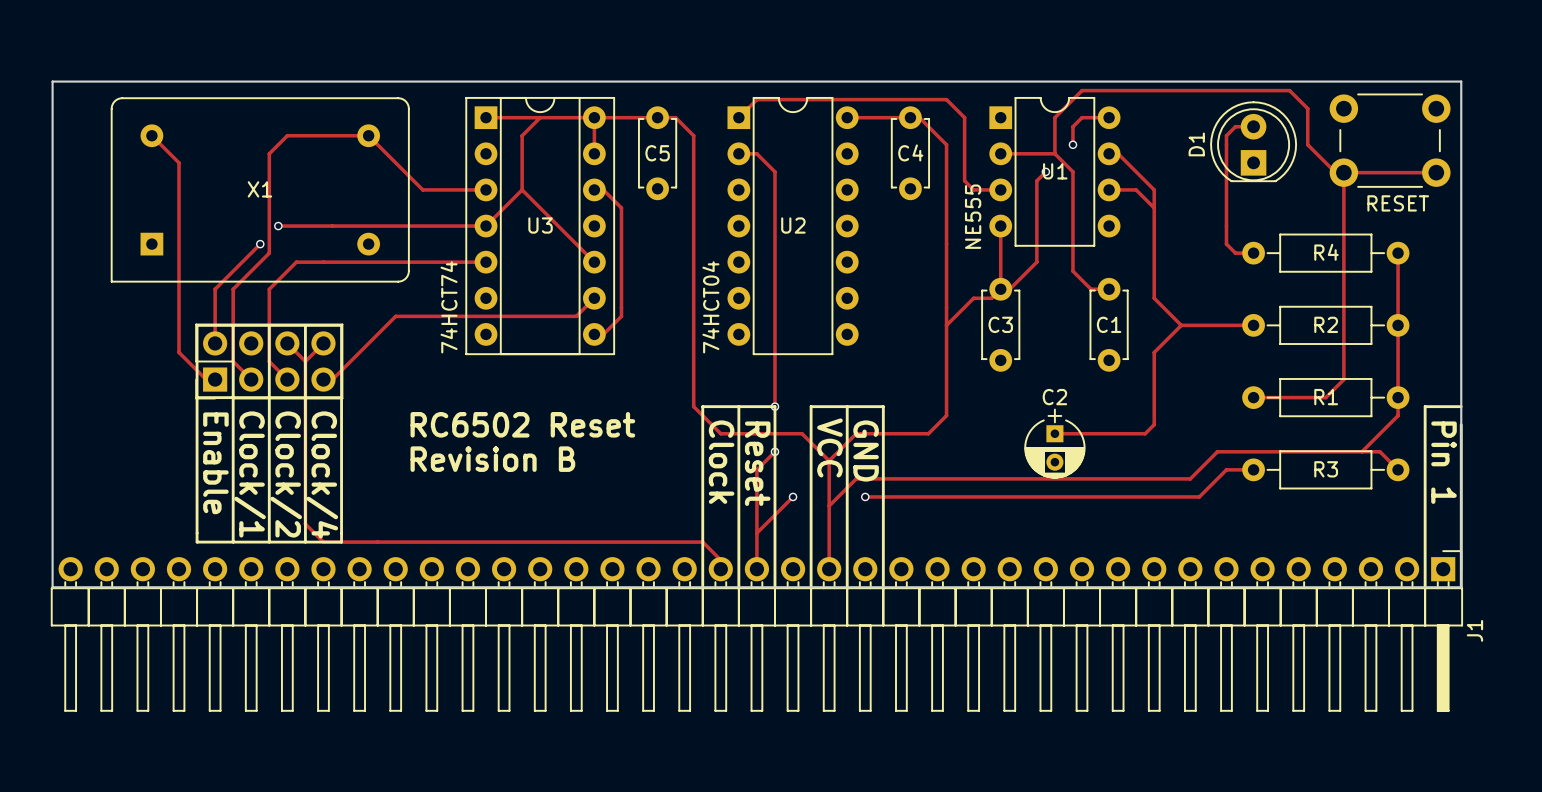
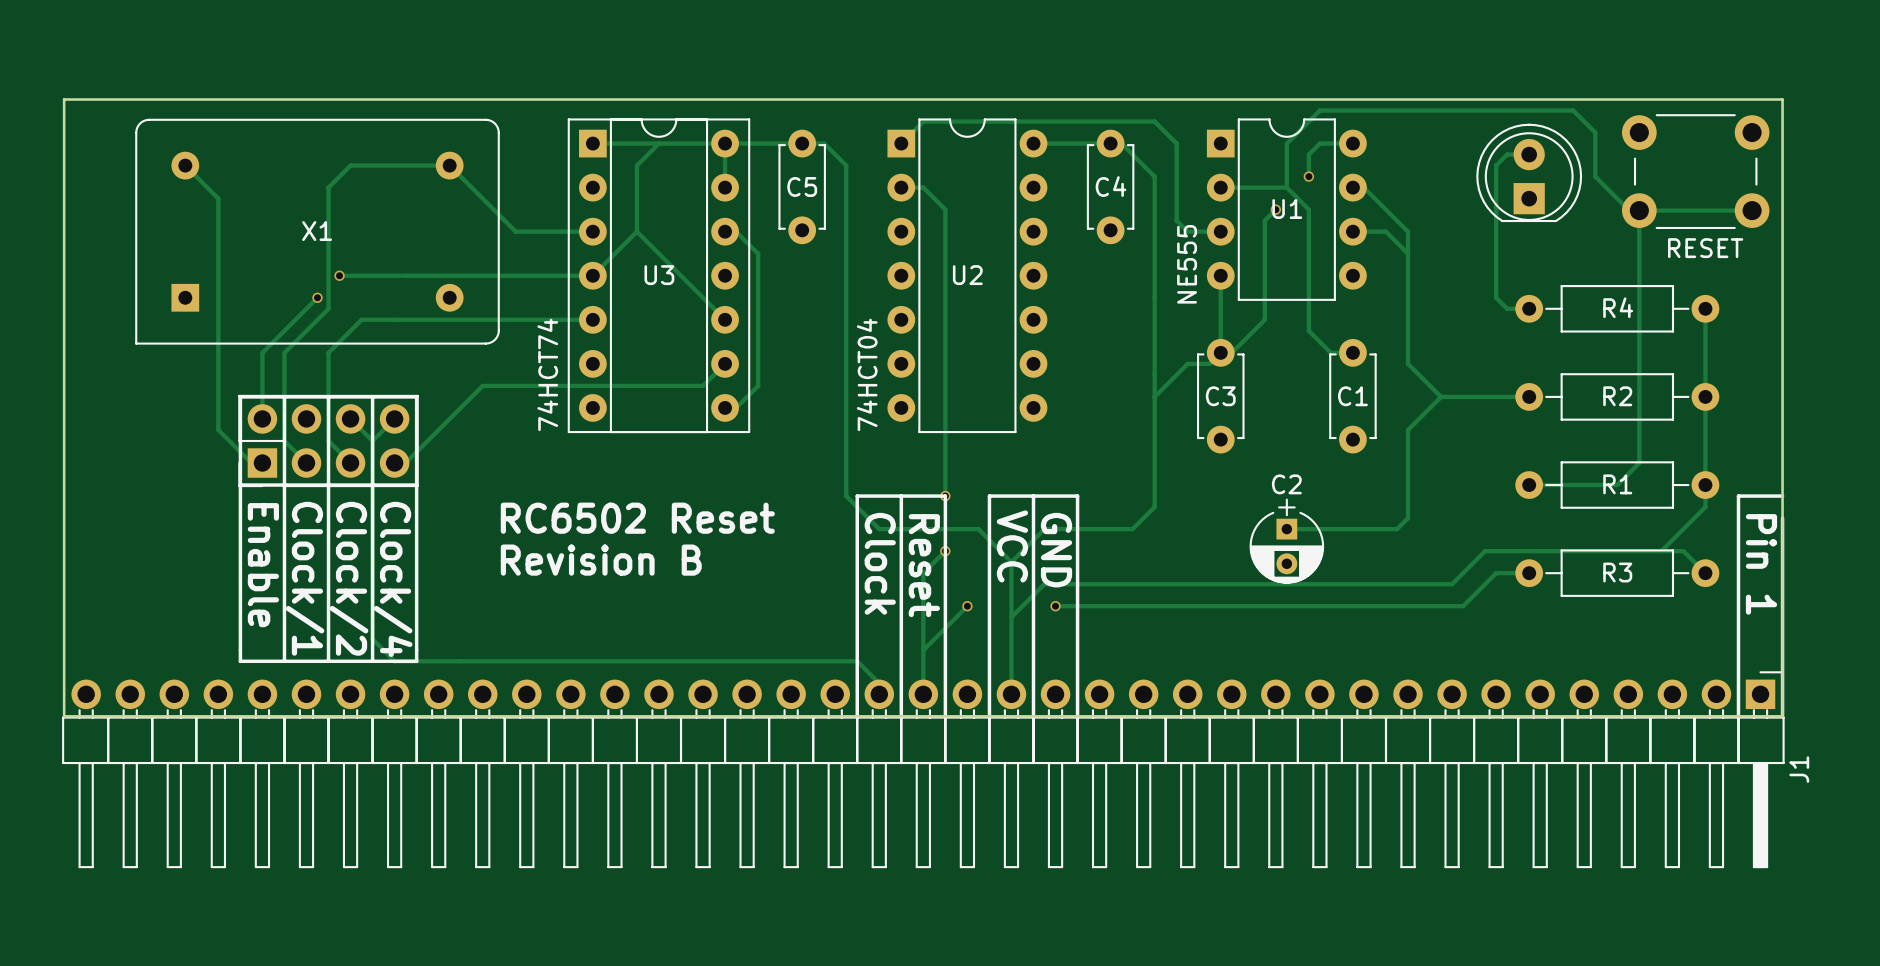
D1 name: D1 (1196, 144) -> none

